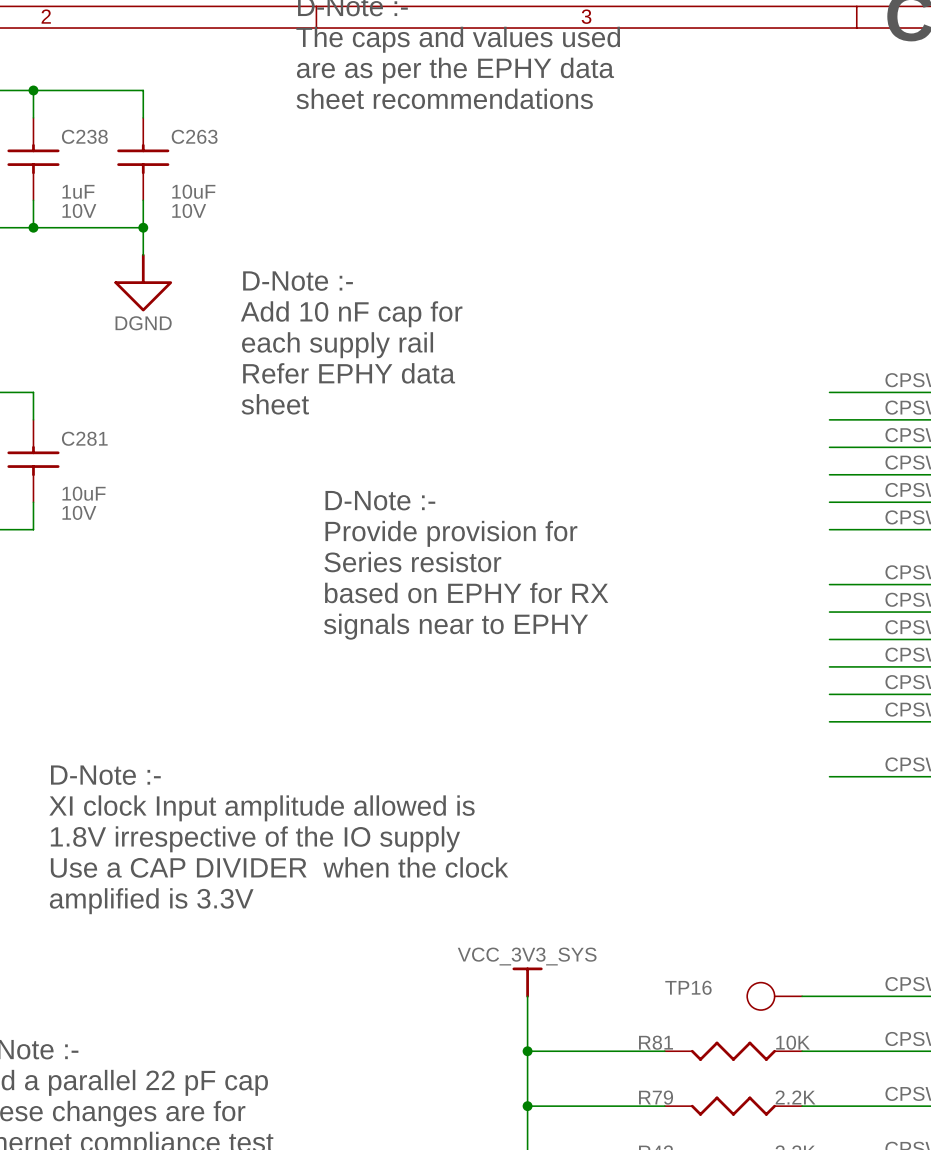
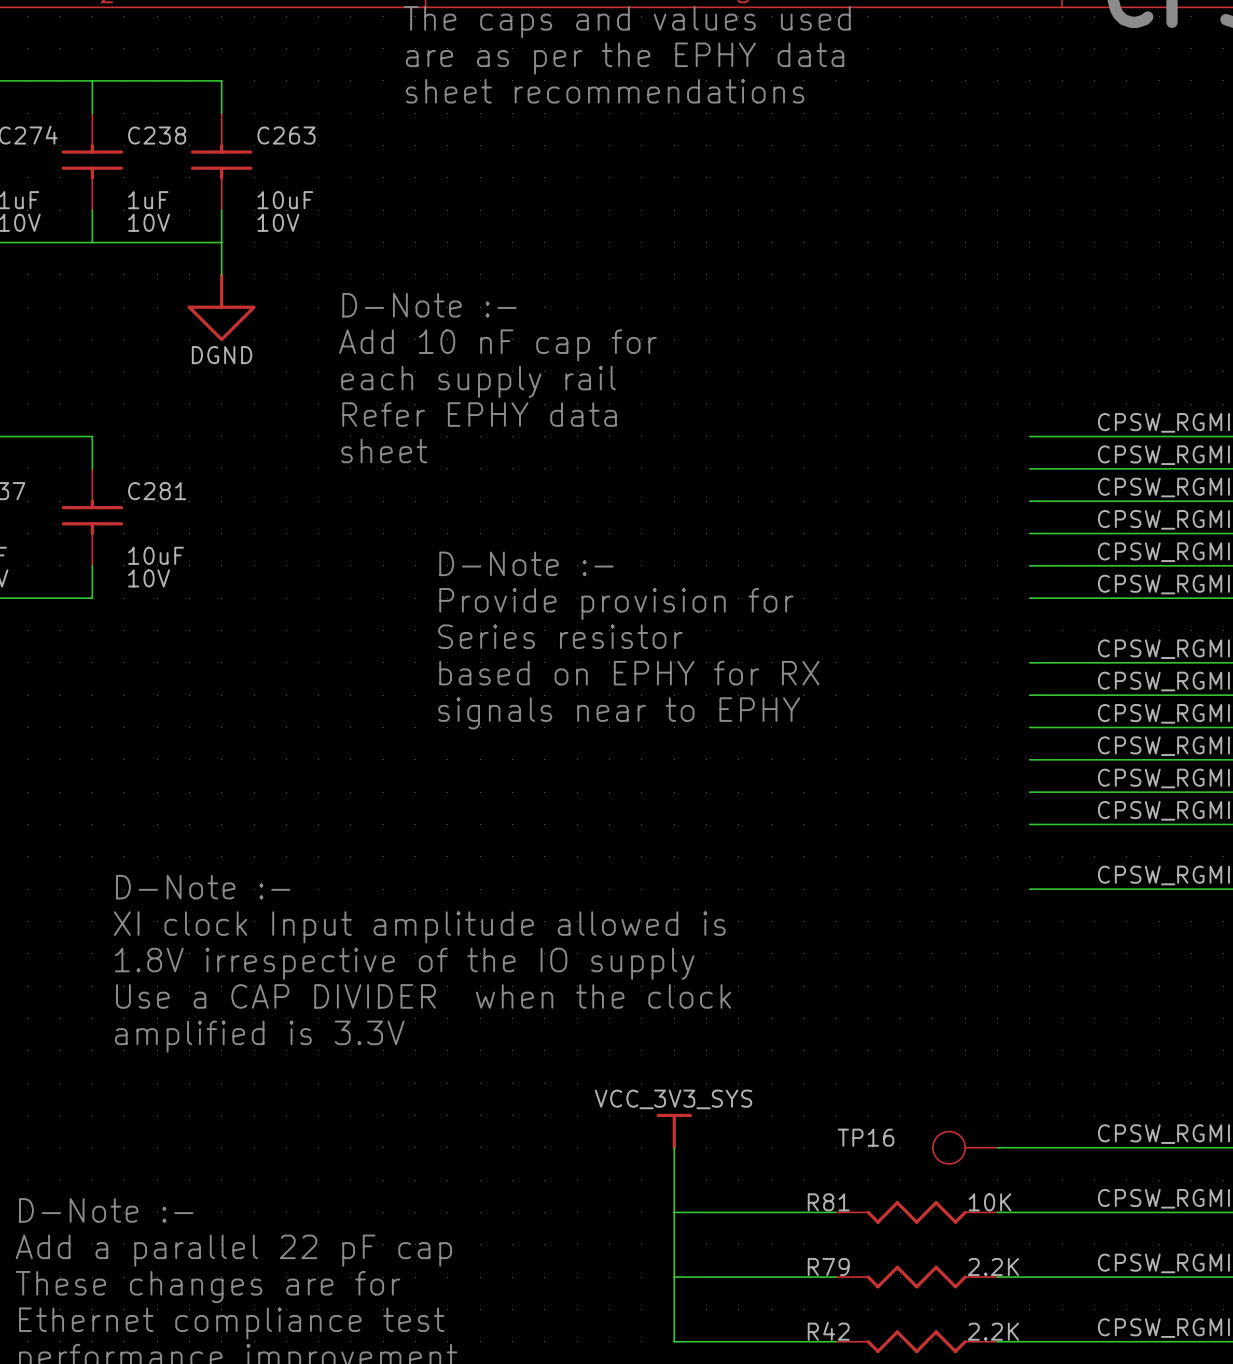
junction: (33, 90) -> none
junction: (33, 227) -> none
junction: (143, 227) -> none
junction: (527, 1051) -> none
junction: (527, 1106) -> none

